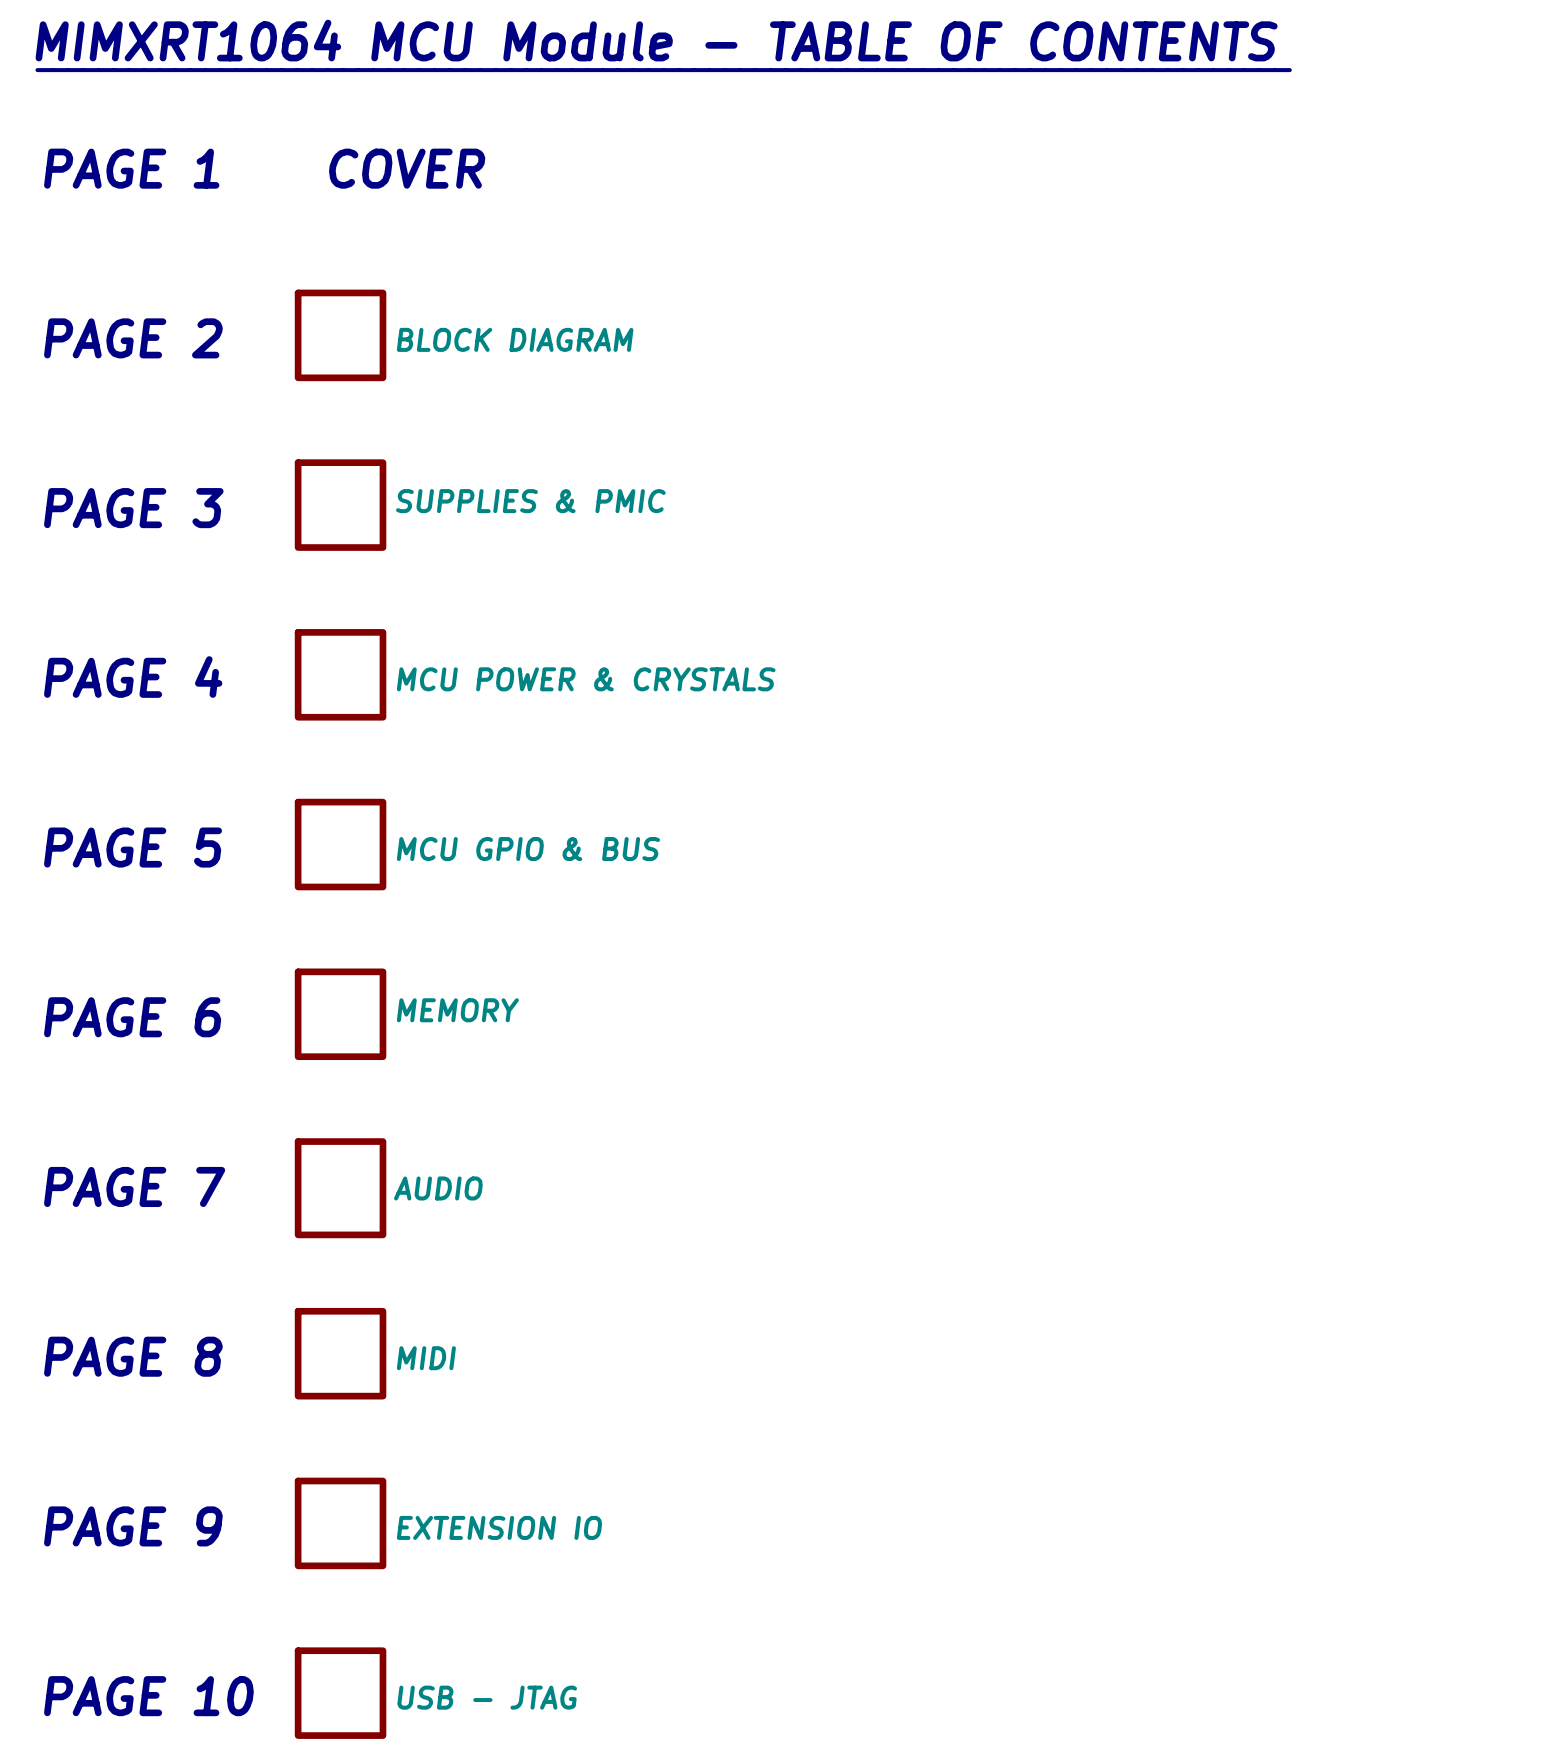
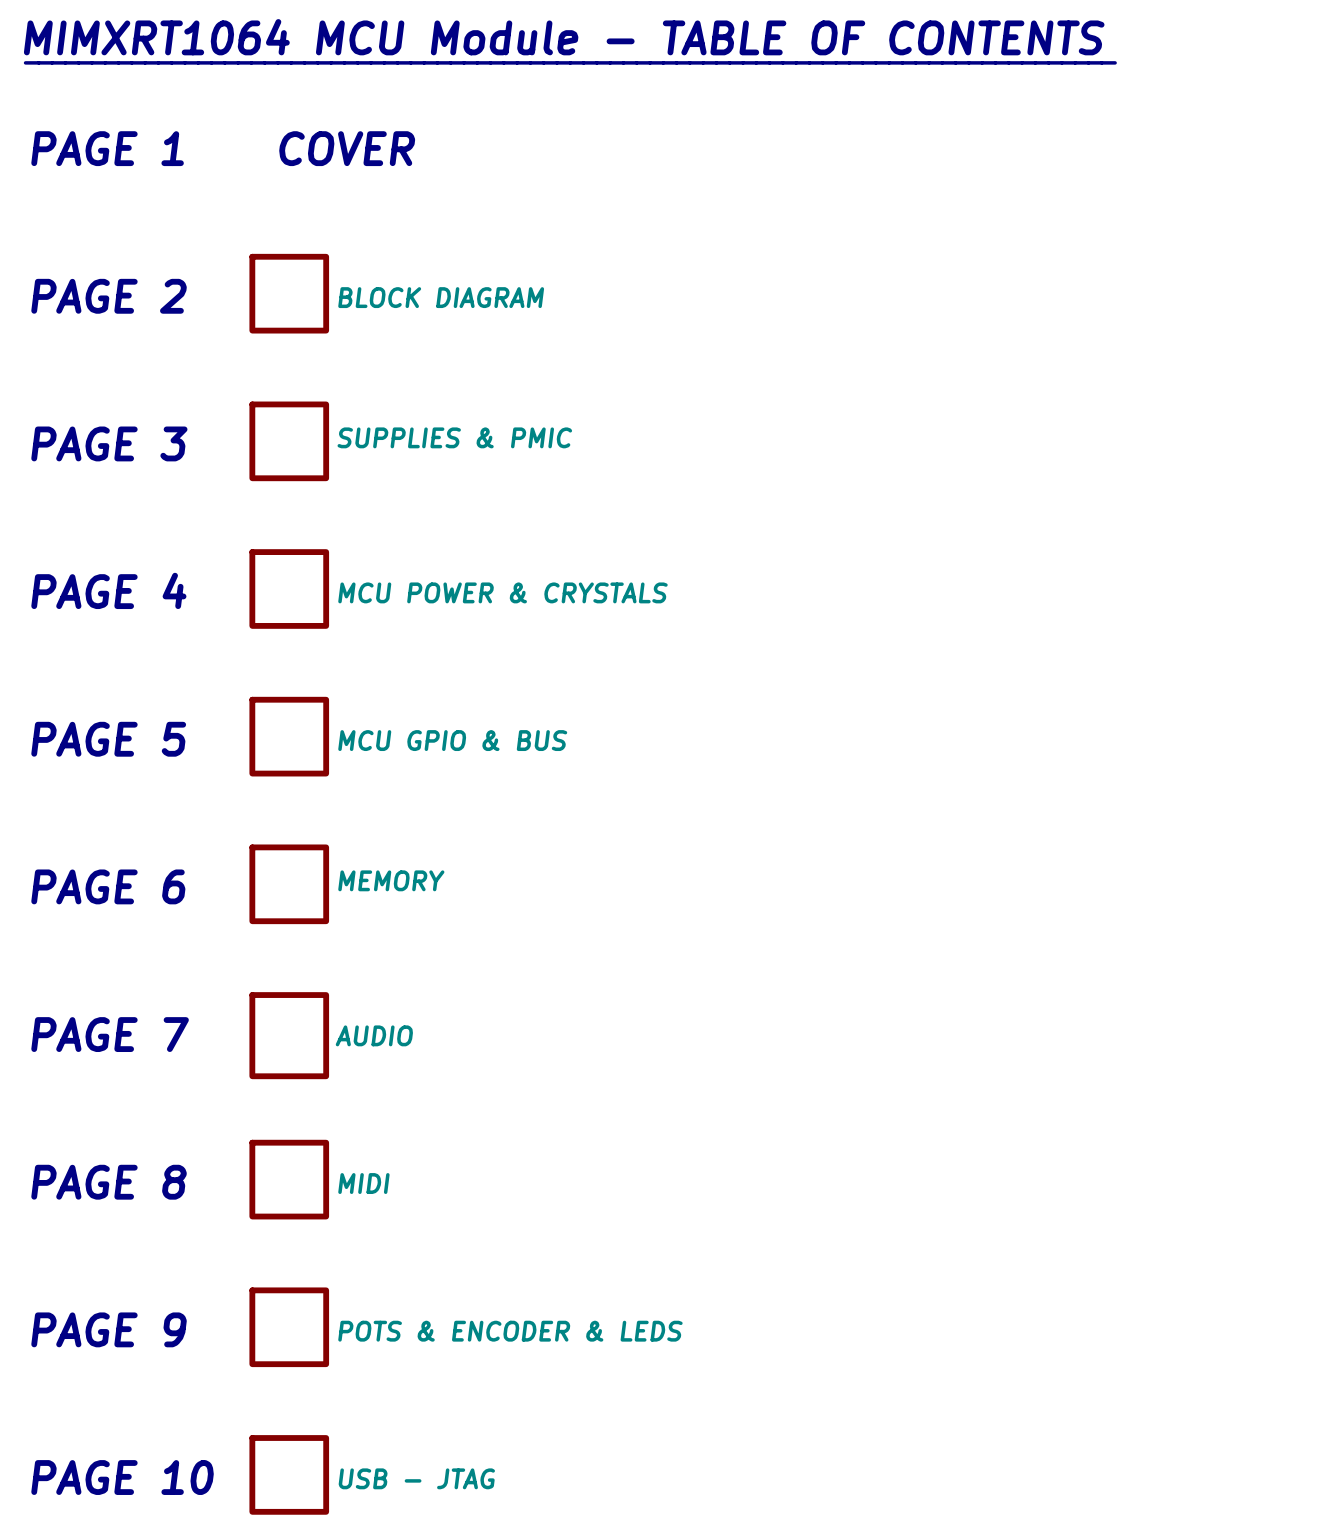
sheet EXTENSION IO name: EXTENSION IO (499, 1527) -> POTS & ENCODER & LEDS (510, 1331)

